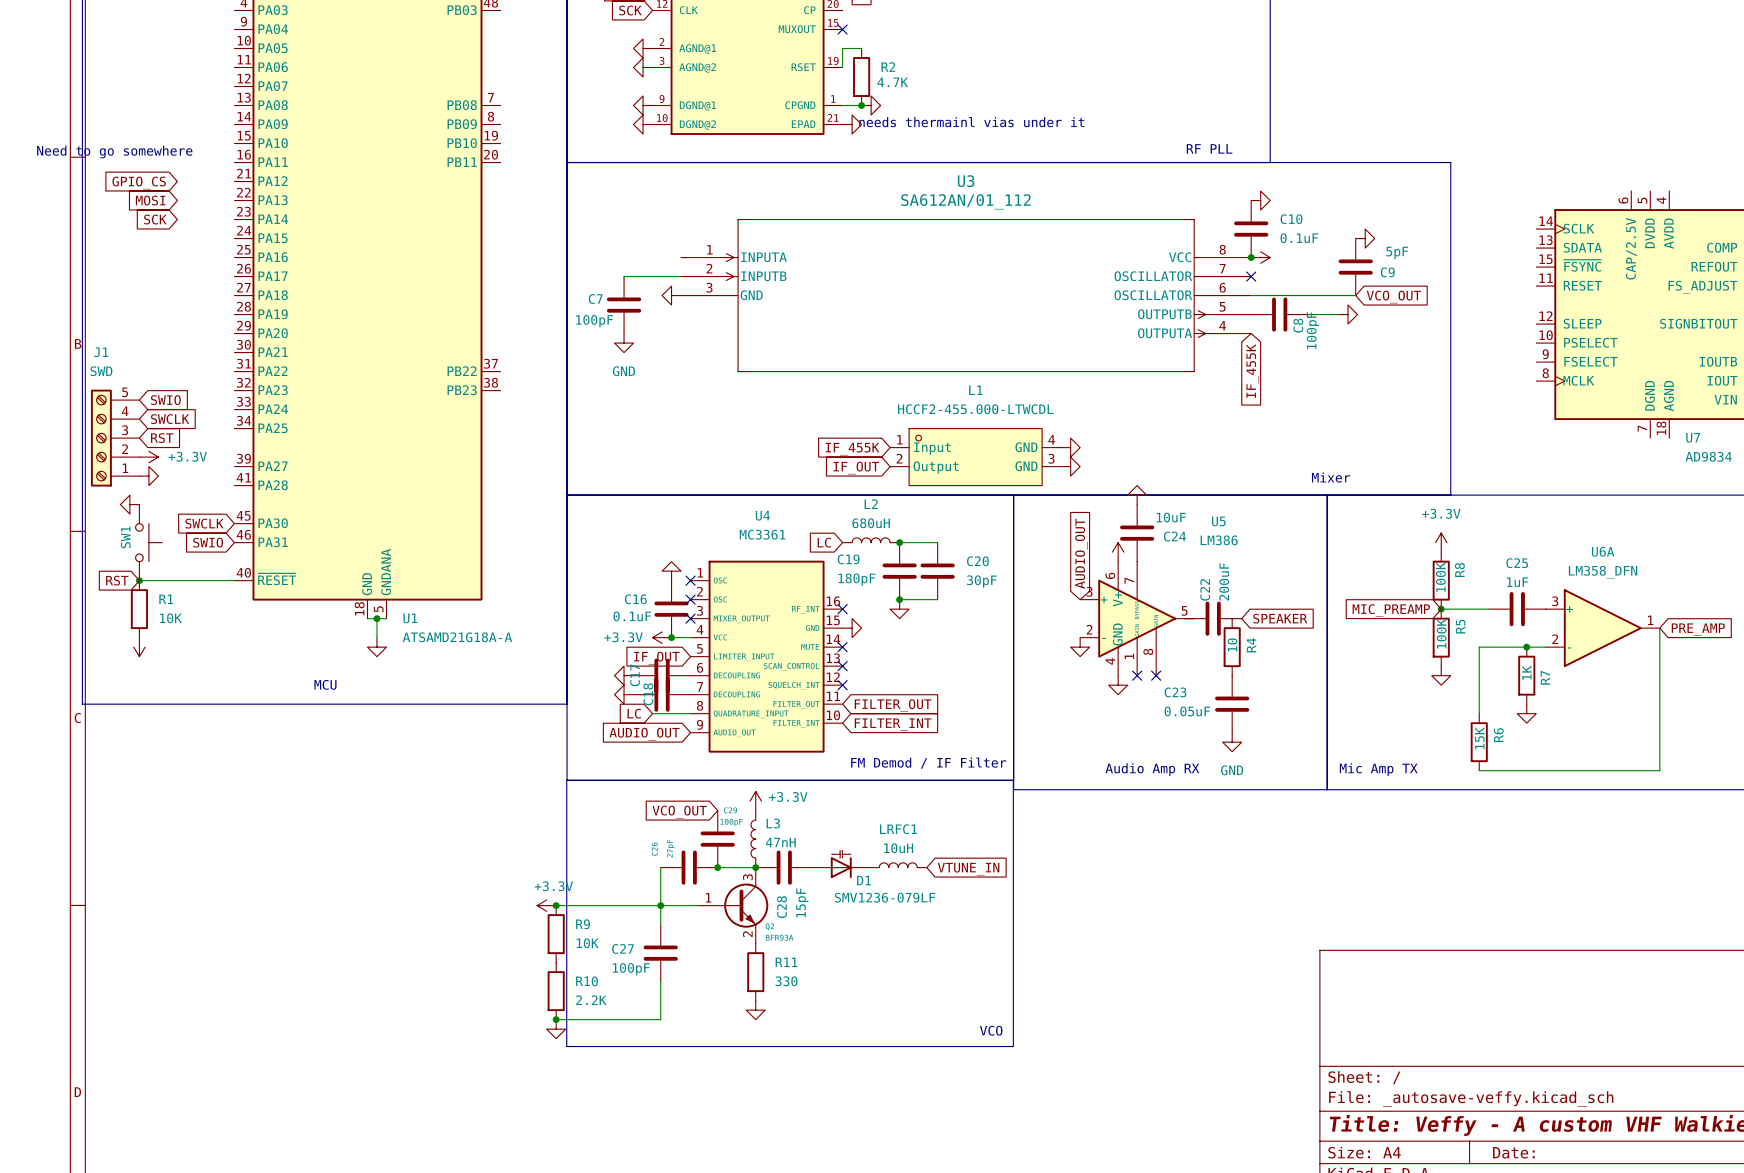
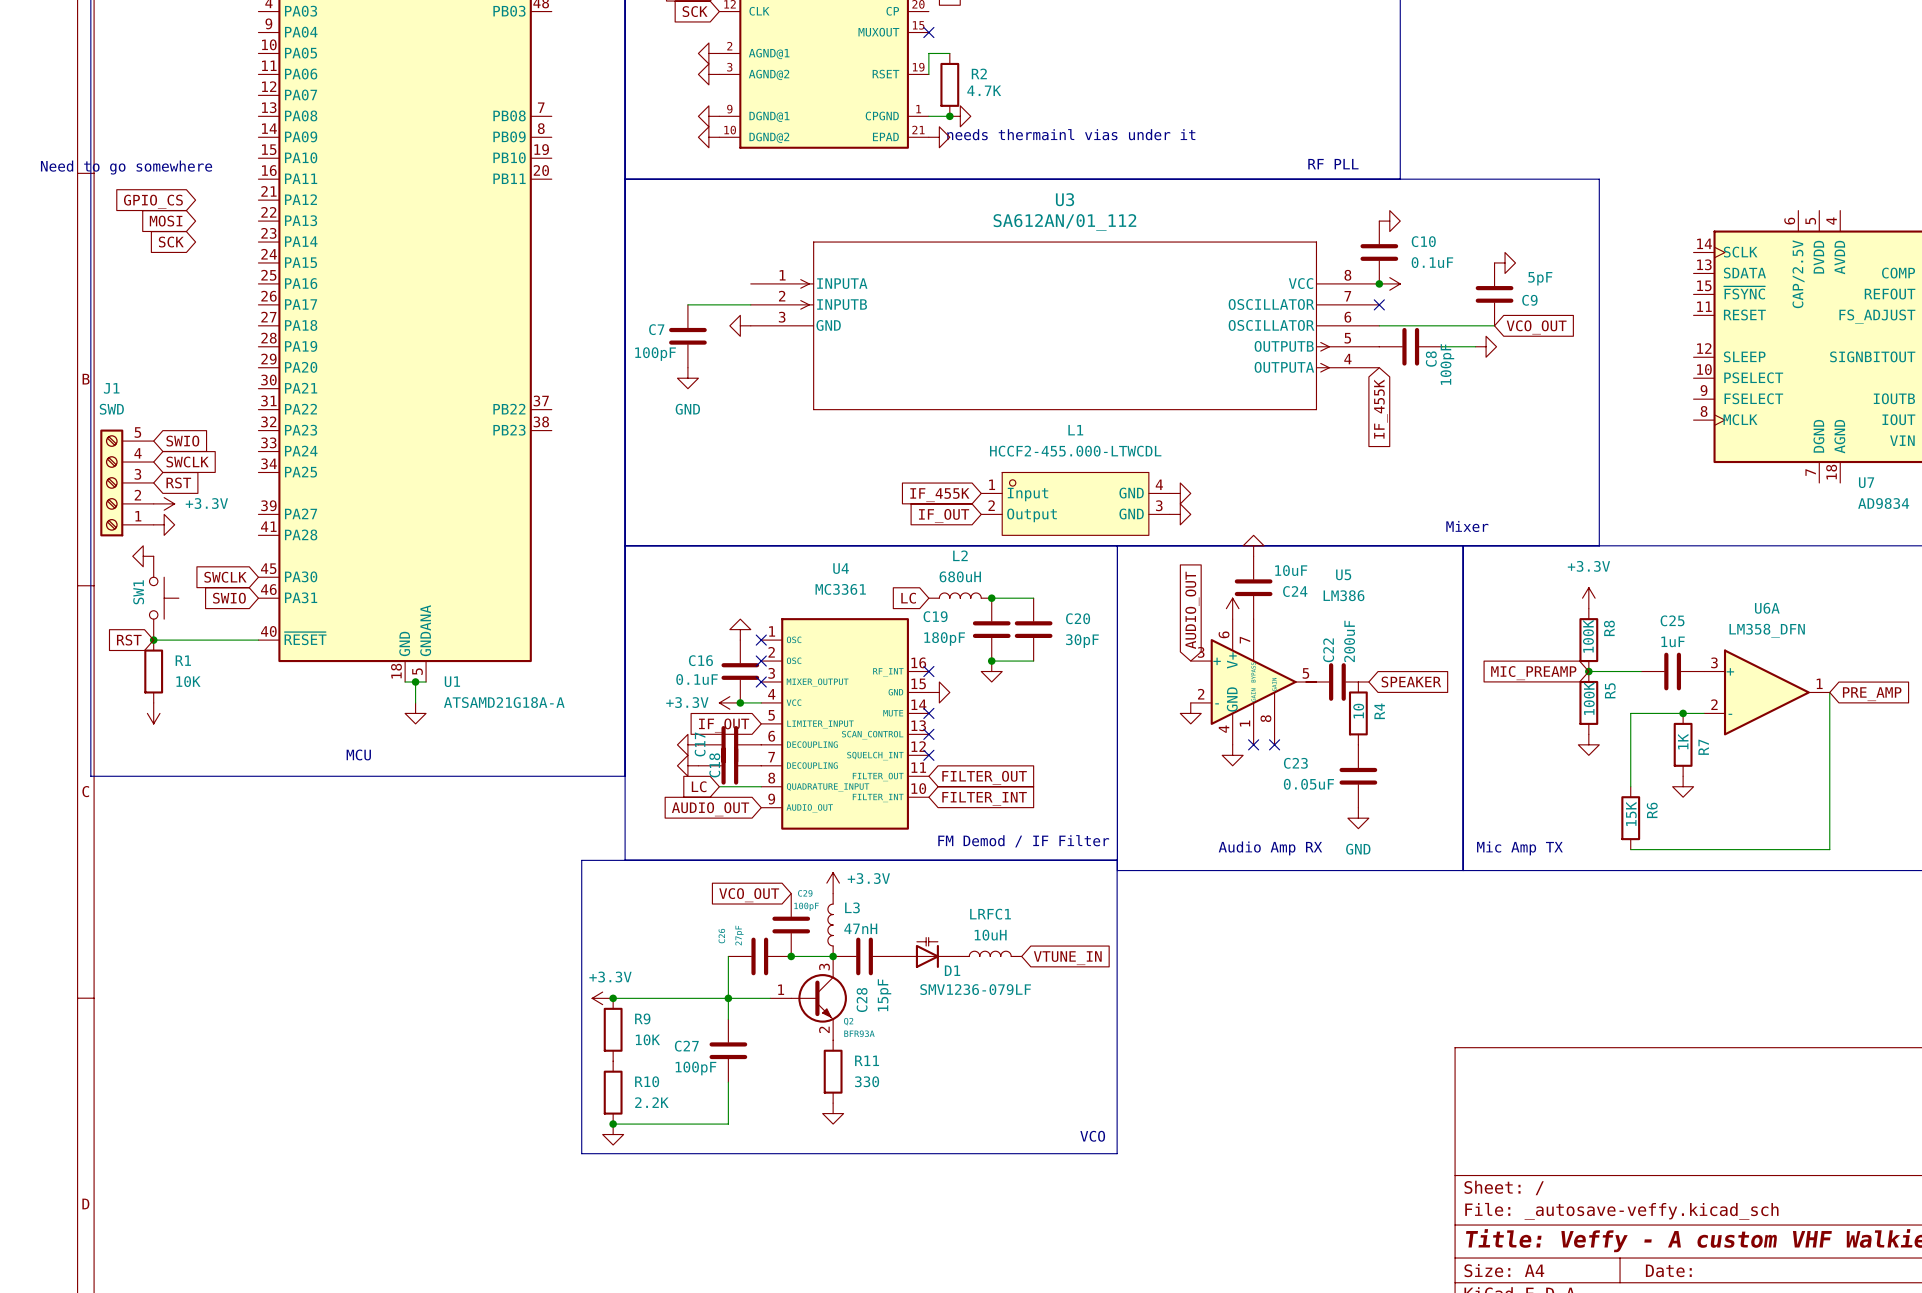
line: (566, 780) (566, 1046) -> (624, 860) (581, 860) (581, 1153) (624, 1153)

